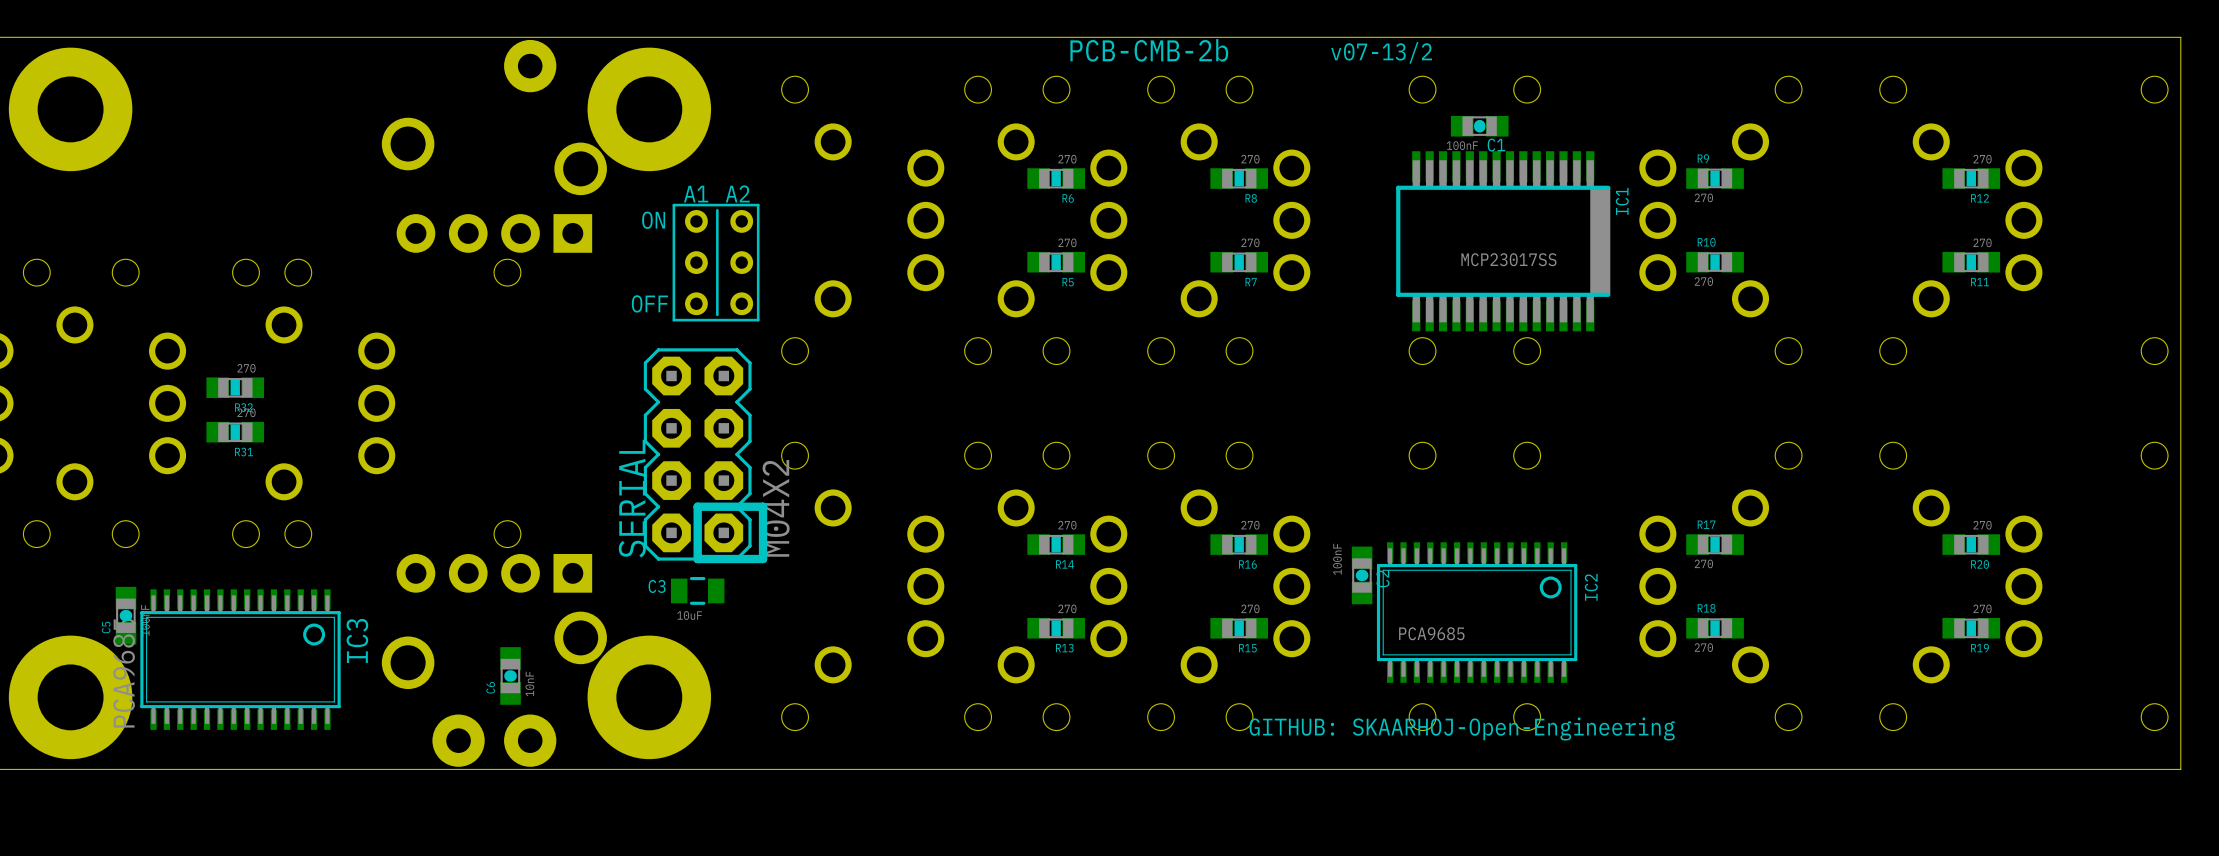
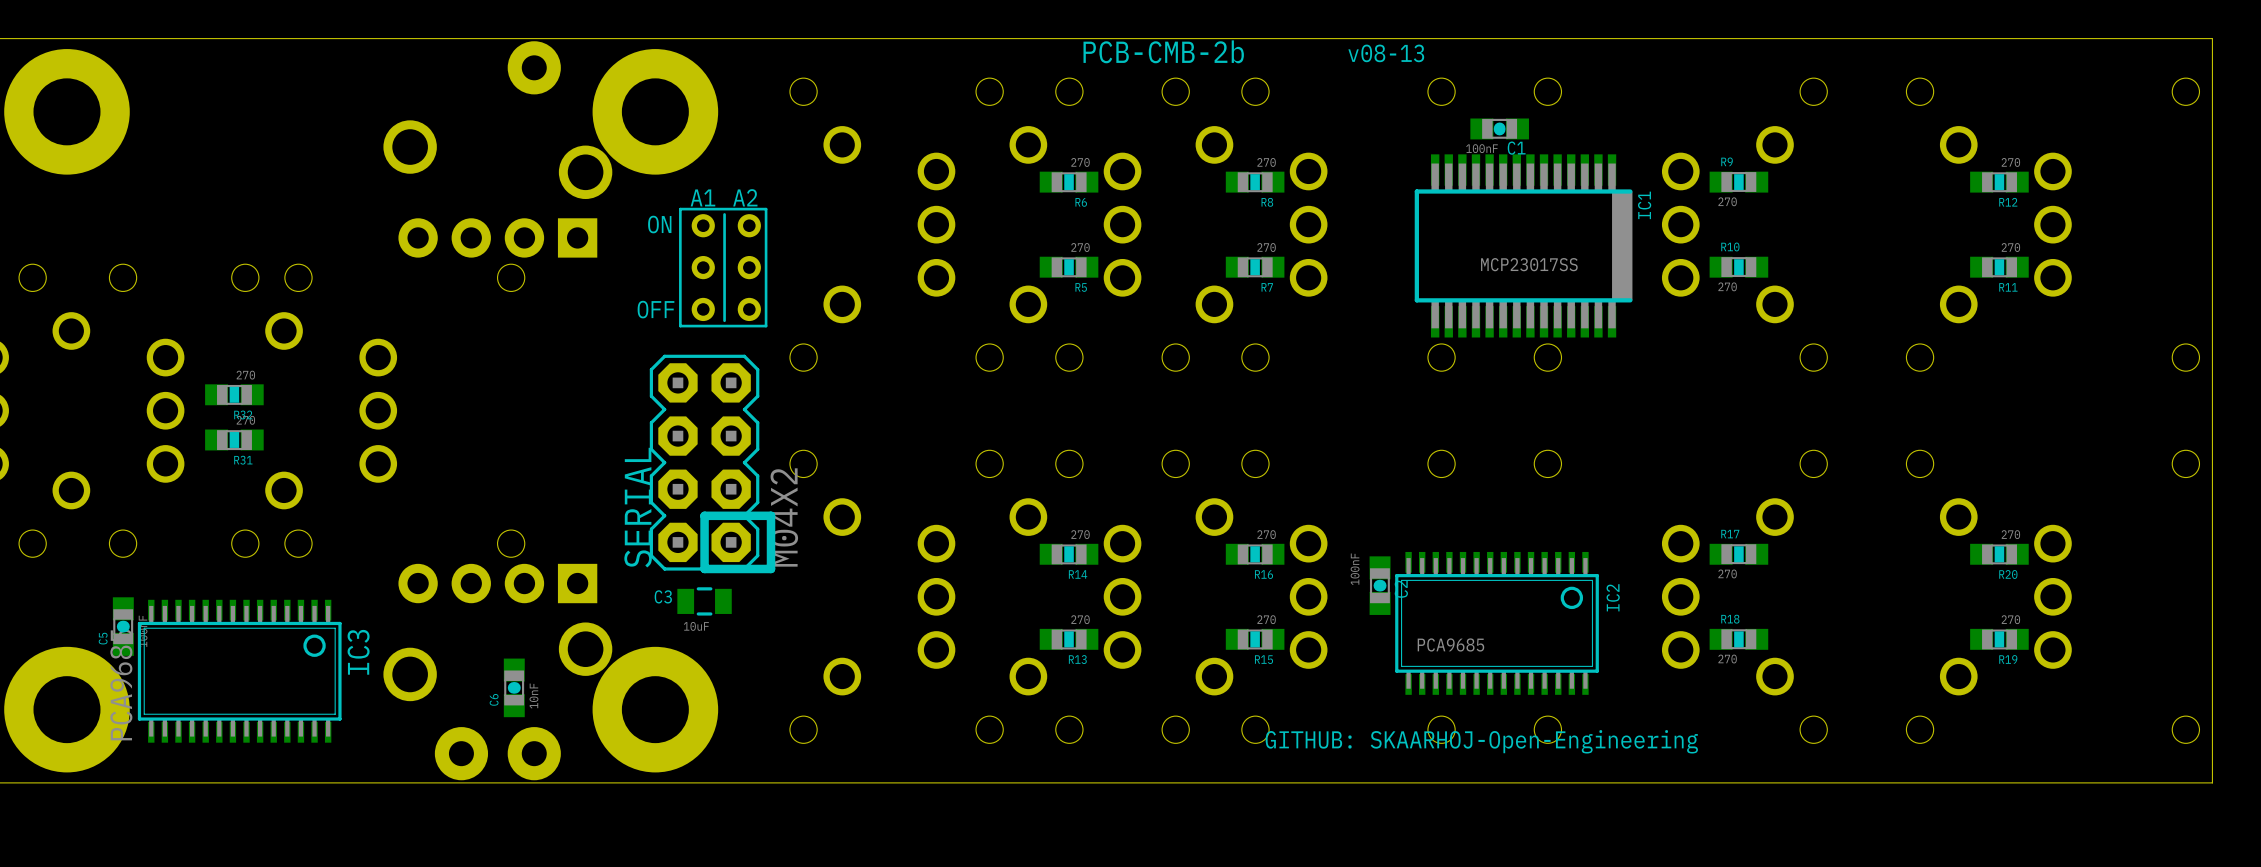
text: v07-13/2 (1381, 52) -> v08-13 (1386, 53)

